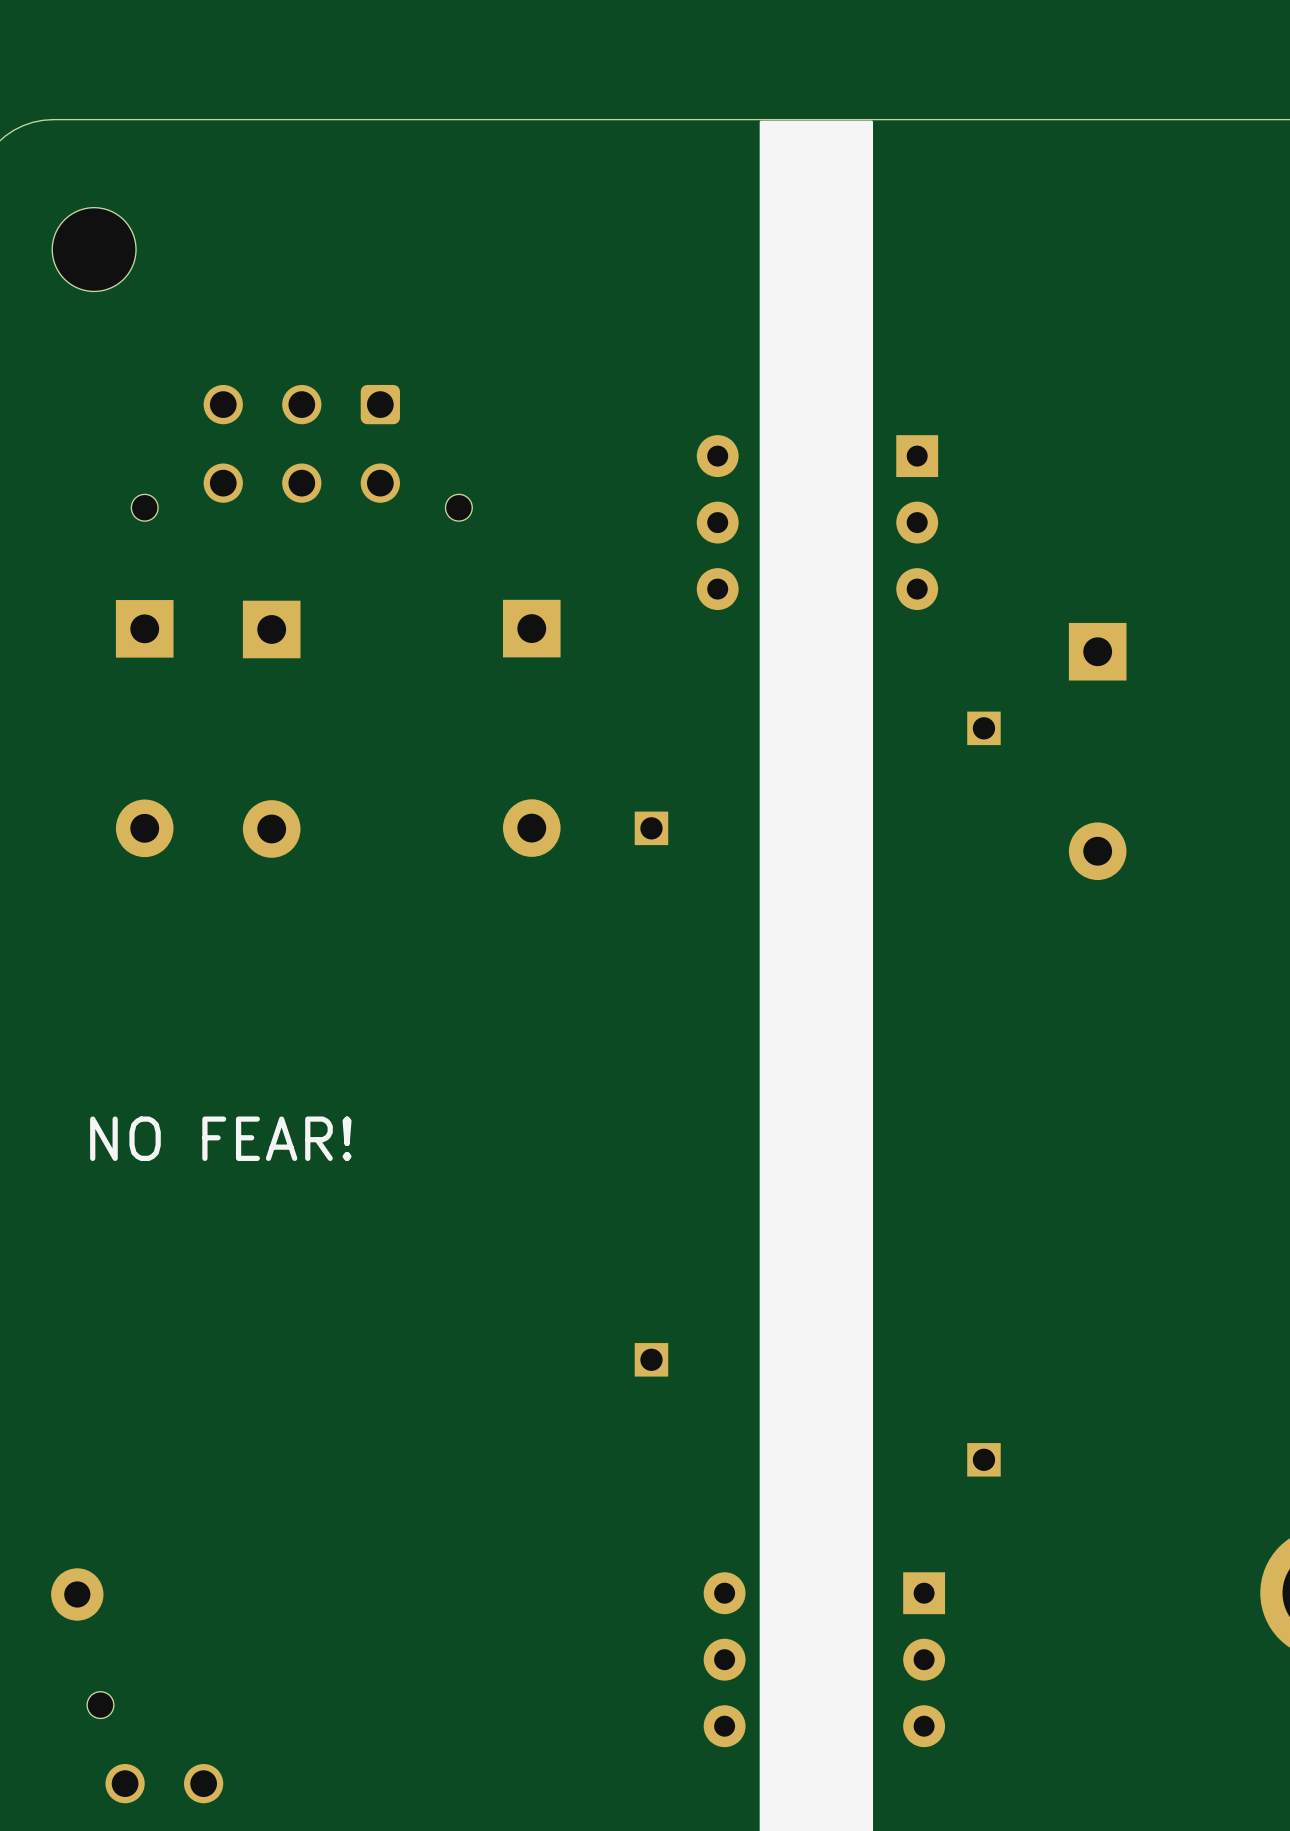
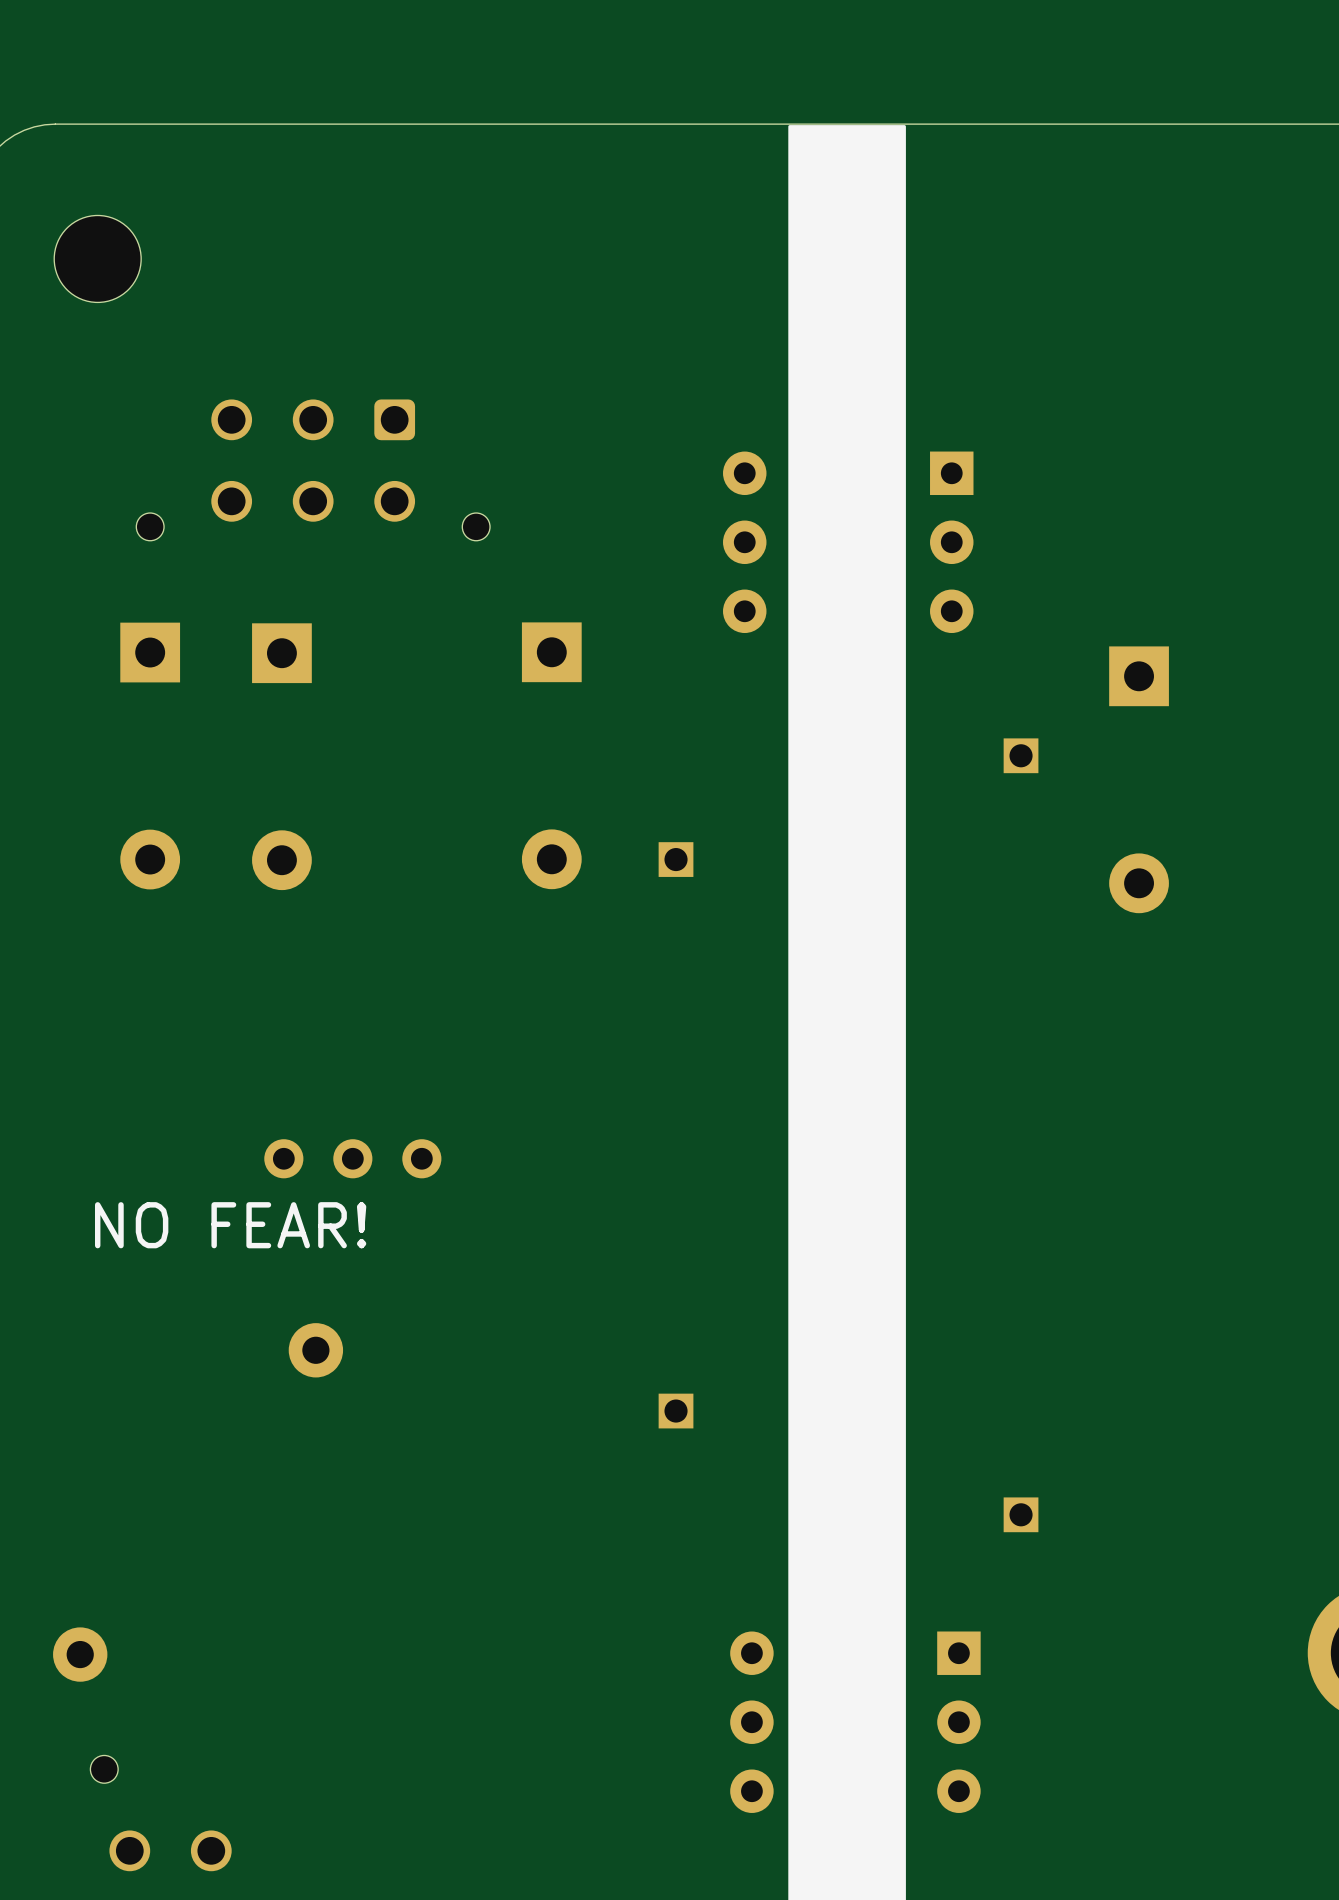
part: none -> (352, 1158)
text position: NO FEAR! (220, 1138) -> NO FEAR! (230, 1225)
part: none -> (315, 1350)

